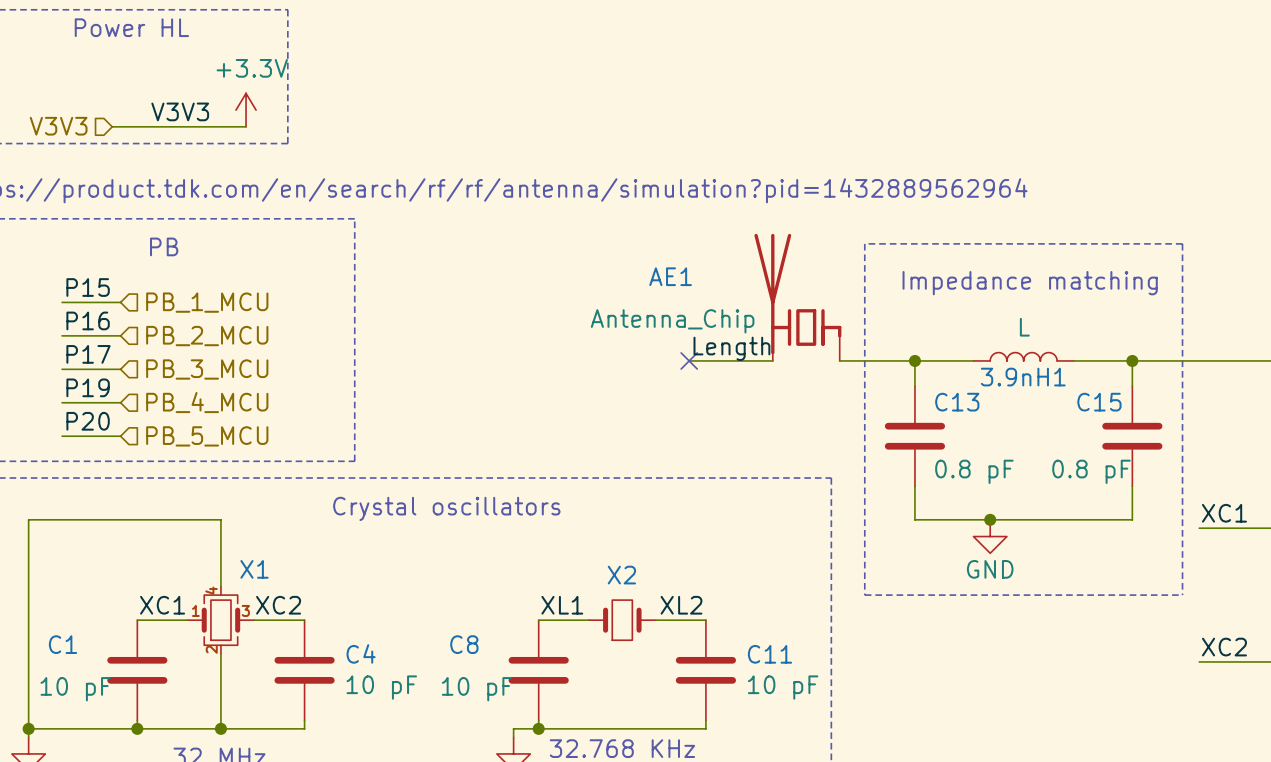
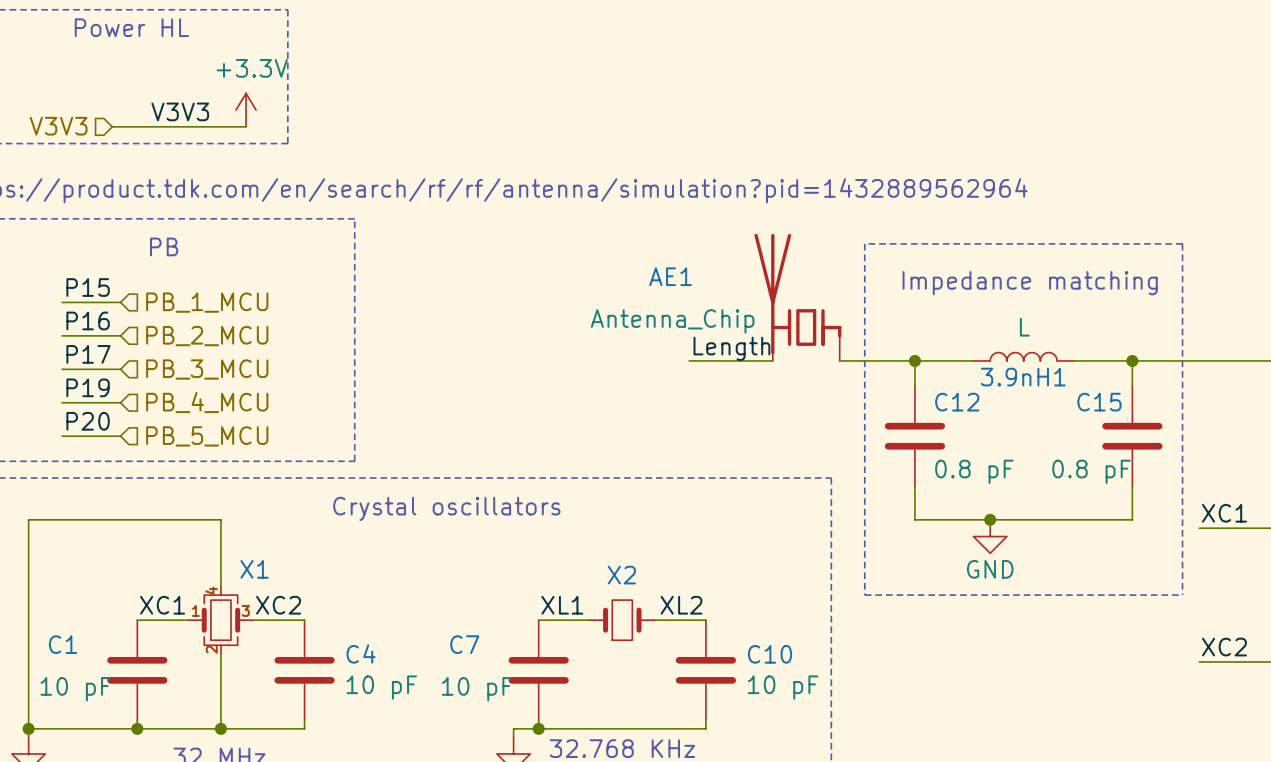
no-connect mark: (689, 360) -> none
C13 name: C13 (957, 402) -> C12 (957, 402)
C8 name: C8 (464, 644) -> C7 (464, 644)
C11 name: C11 (769, 654) -> C10 (769, 654)

